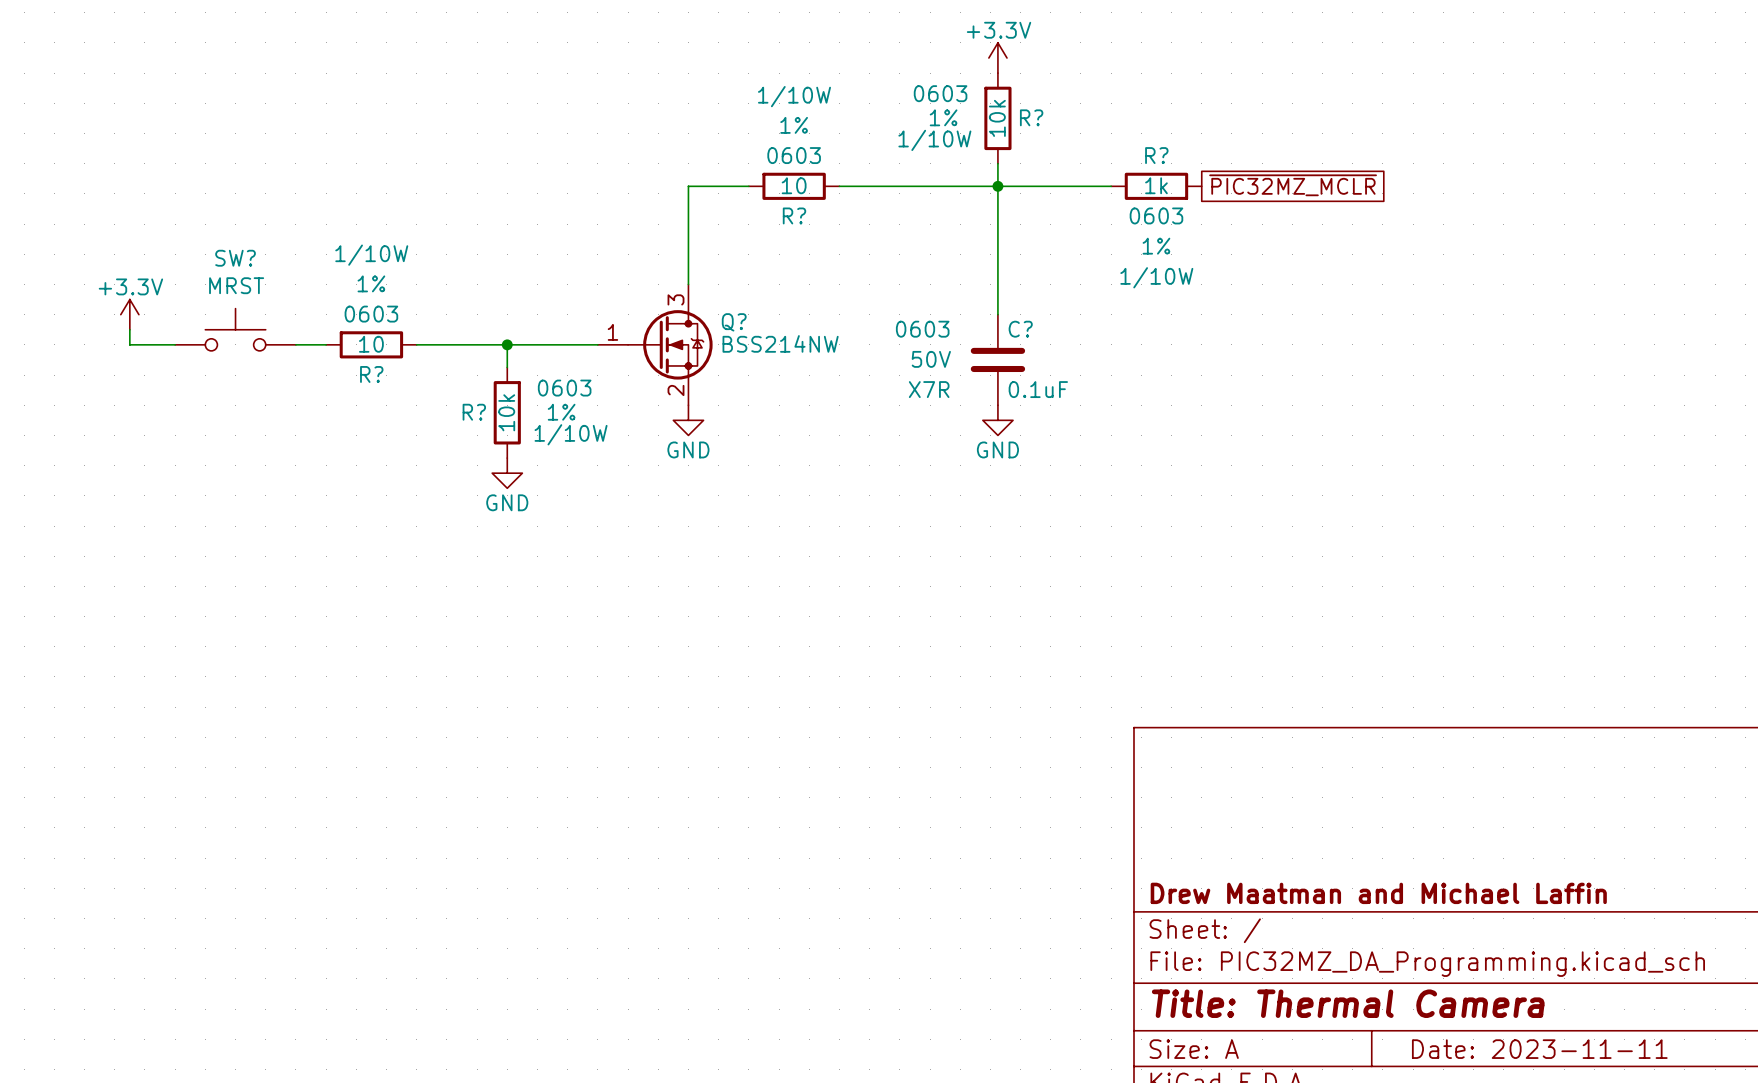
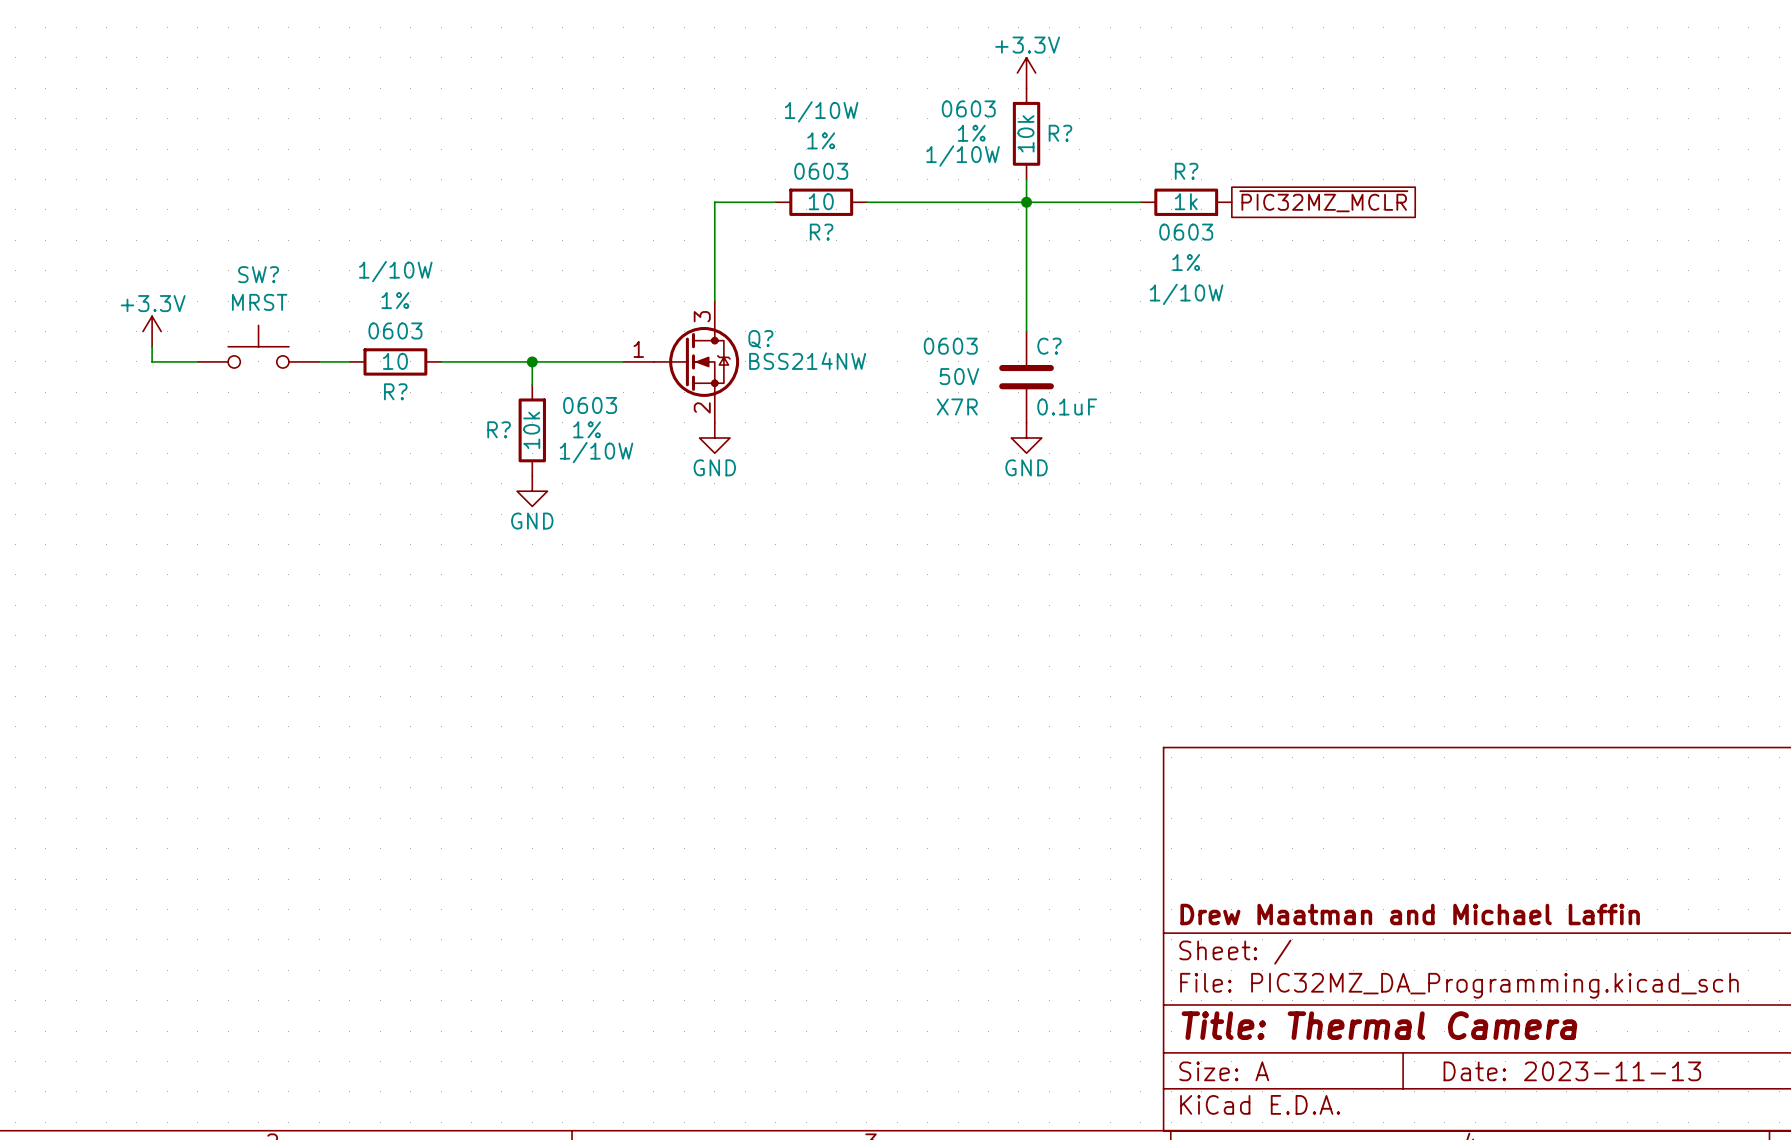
title block: Date: 2023-11-11 (1539, 1049) -> Date: 2023-11-13 (1572, 1071)

